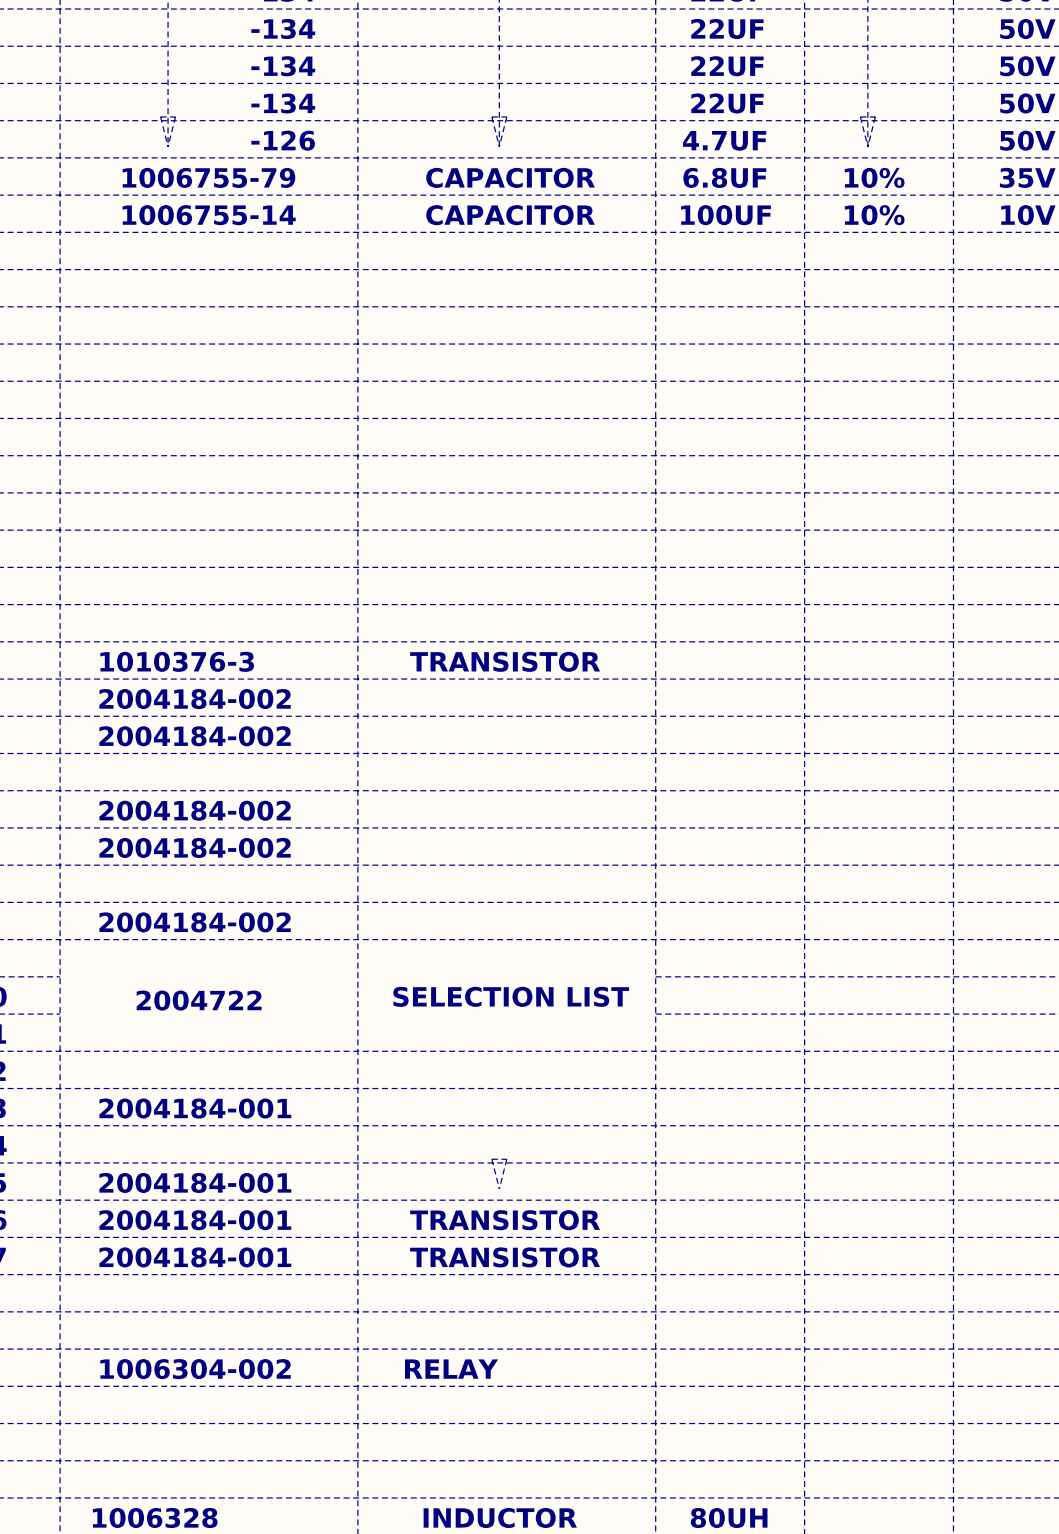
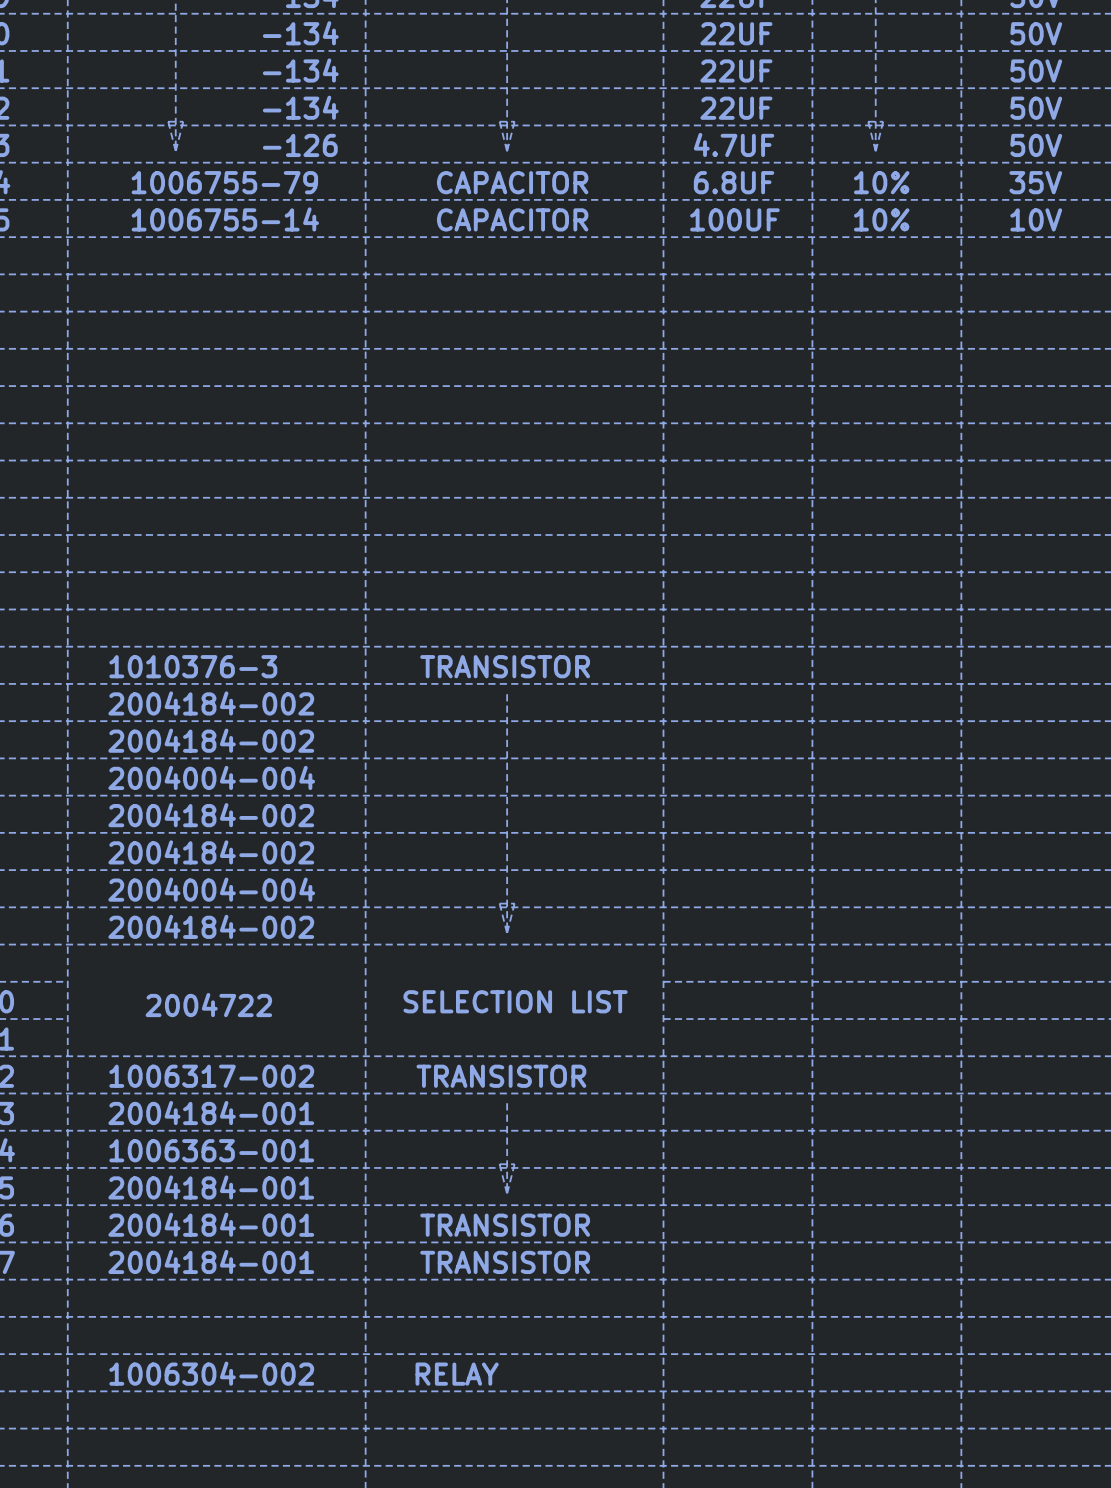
line: none -> (507, 691) (507, 929)
text: none -> 2004004-004 (211, 777)
text: none -> 2004004-004 (211, 889)
line: none -> (499, 903) (507, 933) (514, 903) (499, 903)
text: none -> 1006317-002 (211, 1076)
text: none -> TRANSISTOR (501, 1076)
line: none -> (507, 1100) (507, 1190)
text: none -> 1006363-001 (211, 1150)

